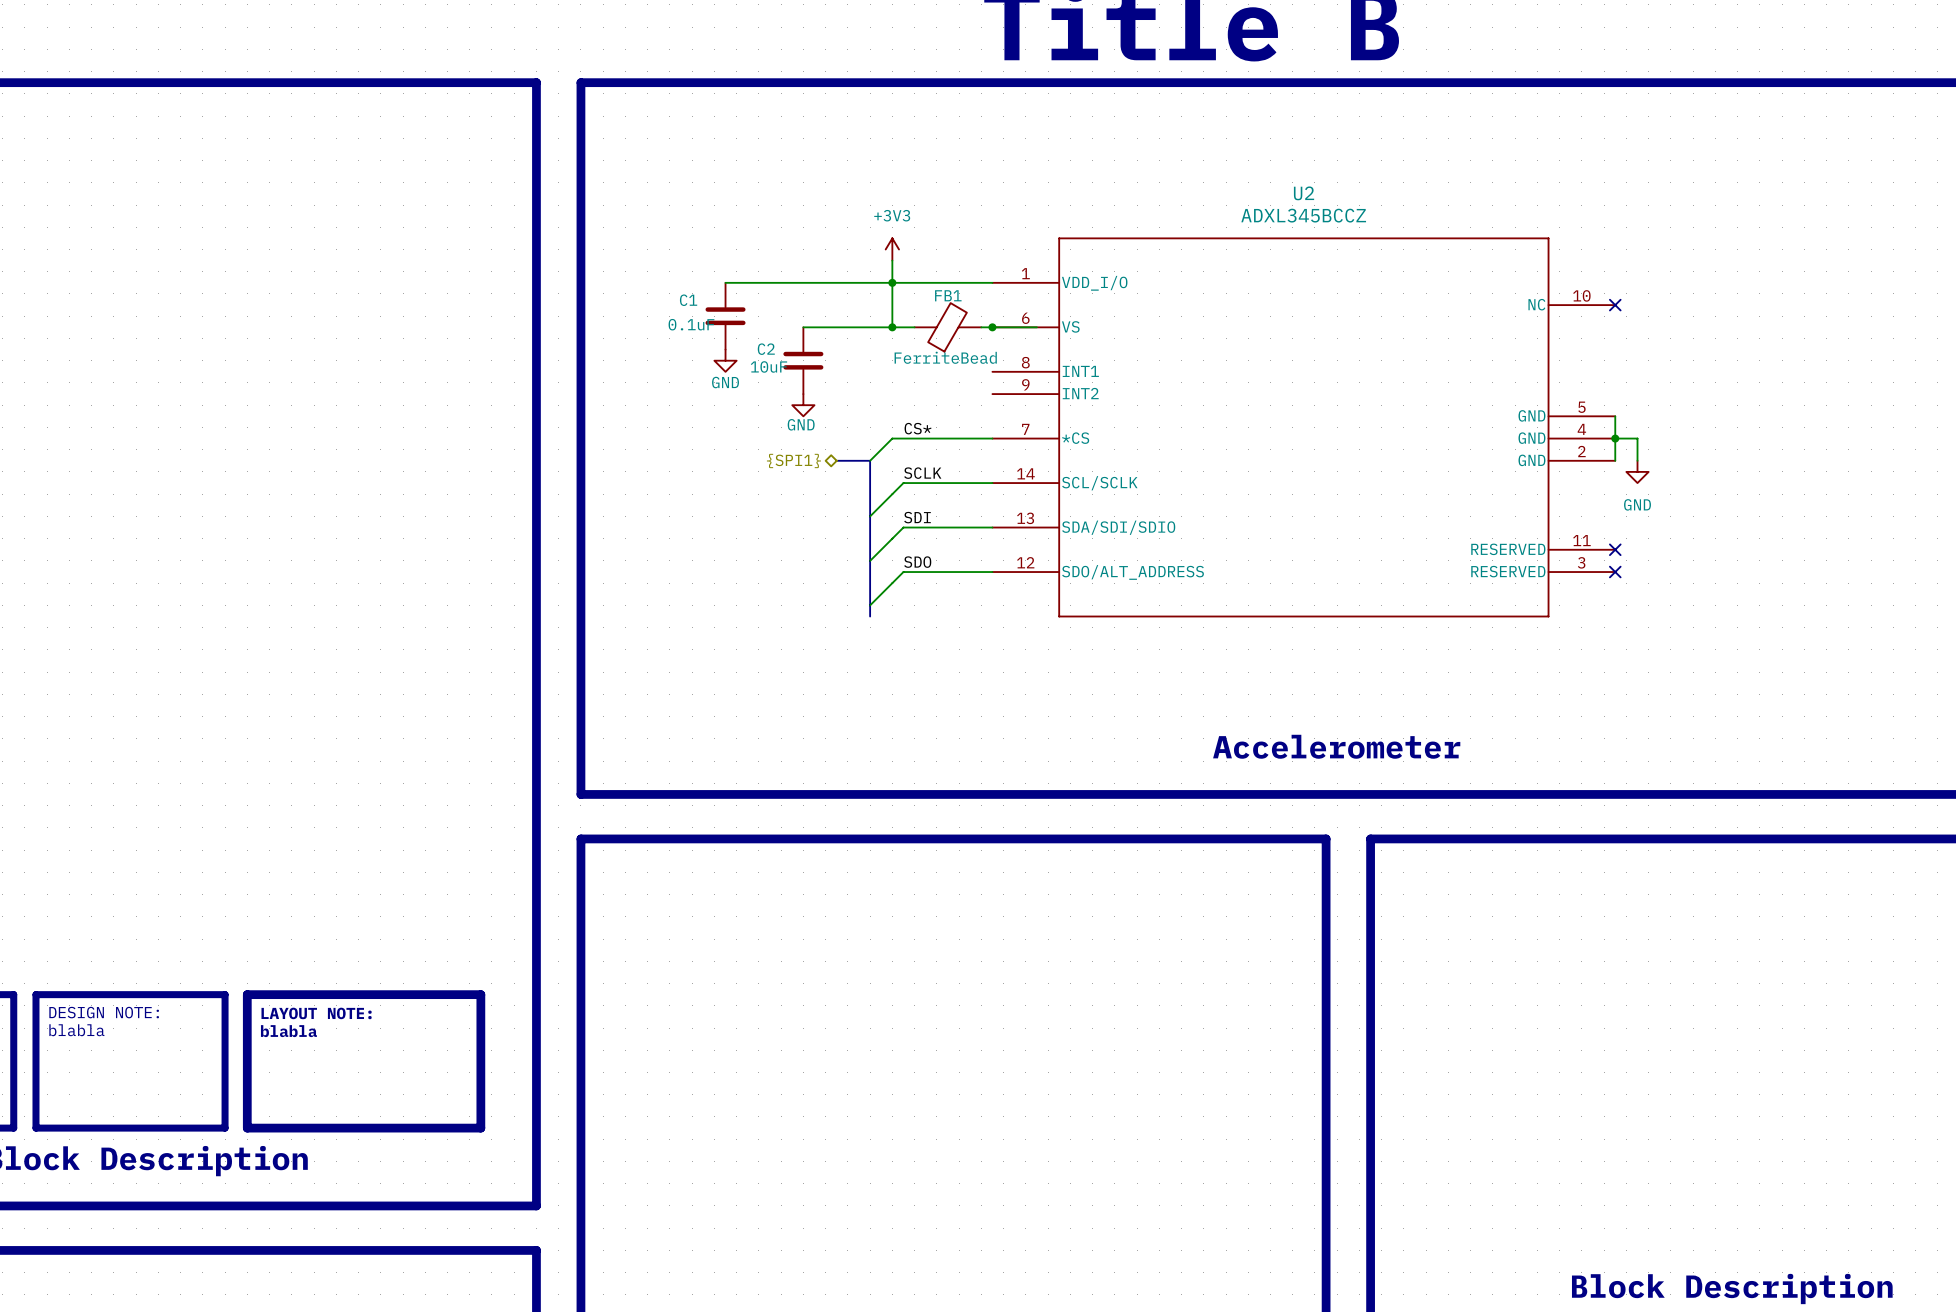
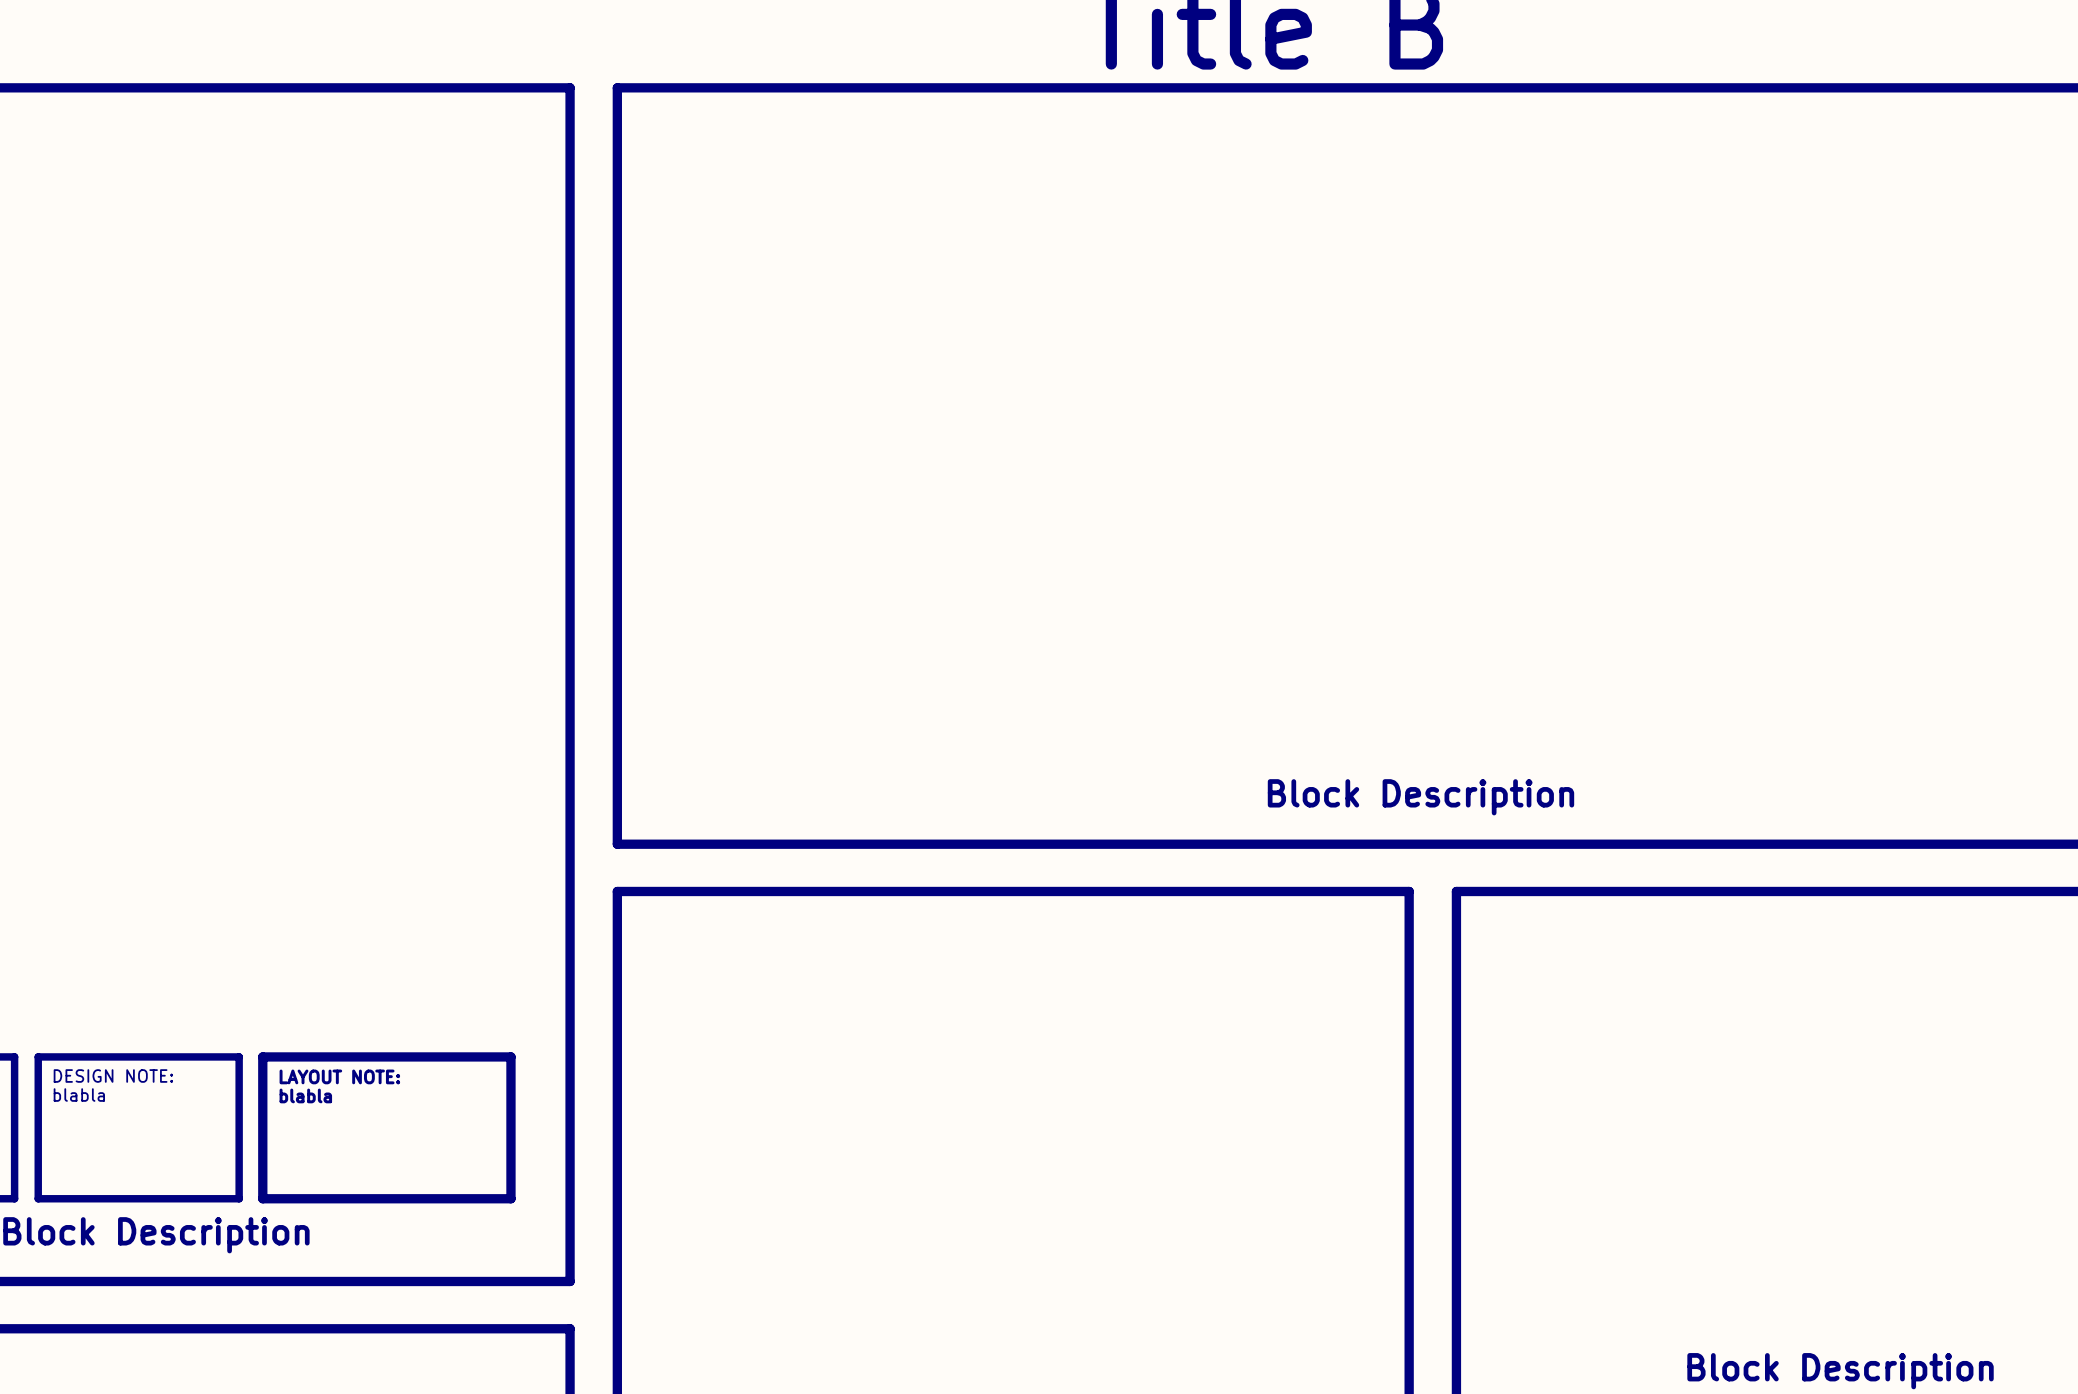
power symbol: +3V3 (892, 249) -> none
wire: (892, 260) (892, 327) -> none
wire: (725, 282) (992, 282) -> none
junction: (892, 282) -> none
no-connect mark: (1615, 305) -> none
C1: 0.1uF (725, 316) -> none
wire: (803, 327) (914, 327) -> none
junction: (892, 327) -> none
FB1: FerriteBead (947, 327) -> none
wire: (981, 327) (1036, 327) -> none
junction: (992, 327) -> none
power symbol: GND (725, 360) -> none
C2: 10uF (803, 360) -> none
power symbol: GND (803, 405) -> none
wire: (1615, 416) (1615, 460) -> none
U2: ADXL345BCCZ (1303, 427) -> none
label: CS* (918, 428) -> none
wire: (992, 438) (892, 438) (870, 460) -> none
wire: (1615, 438) (1637, 438) (1637, 460) -> none
junction: (1615, 438) -> none
hierarchical label: {SPI1} (793, 460) -> none
bus: (836, 460) (870, 460) (870, 616) -> none
power symbol: GND (1637, 471) -> none
label: SCLK (922, 473) -> none
wire: (992, 483) (903, 483) (870, 516) -> none
label: SDI (917, 517) -> none
wire: (992, 527) (903, 527) (870, 560) -> none
no-connect mark: (1615, 549) -> none
label: SDO (917, 562) -> none
wire: (992, 572) (903, 572) (870, 605) -> none
no-connect mark: (1615, 572) -> none
text: Accelerometer (1336, 746) -> Block Description (1420, 797)

